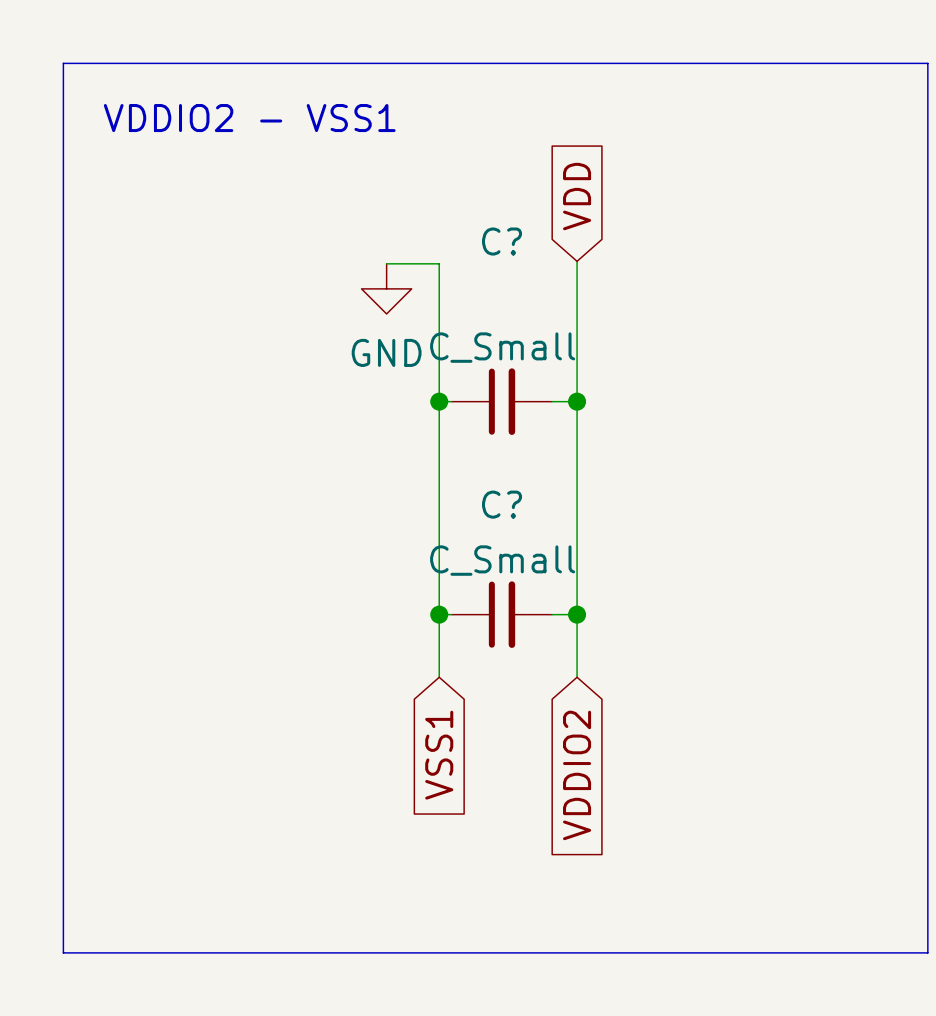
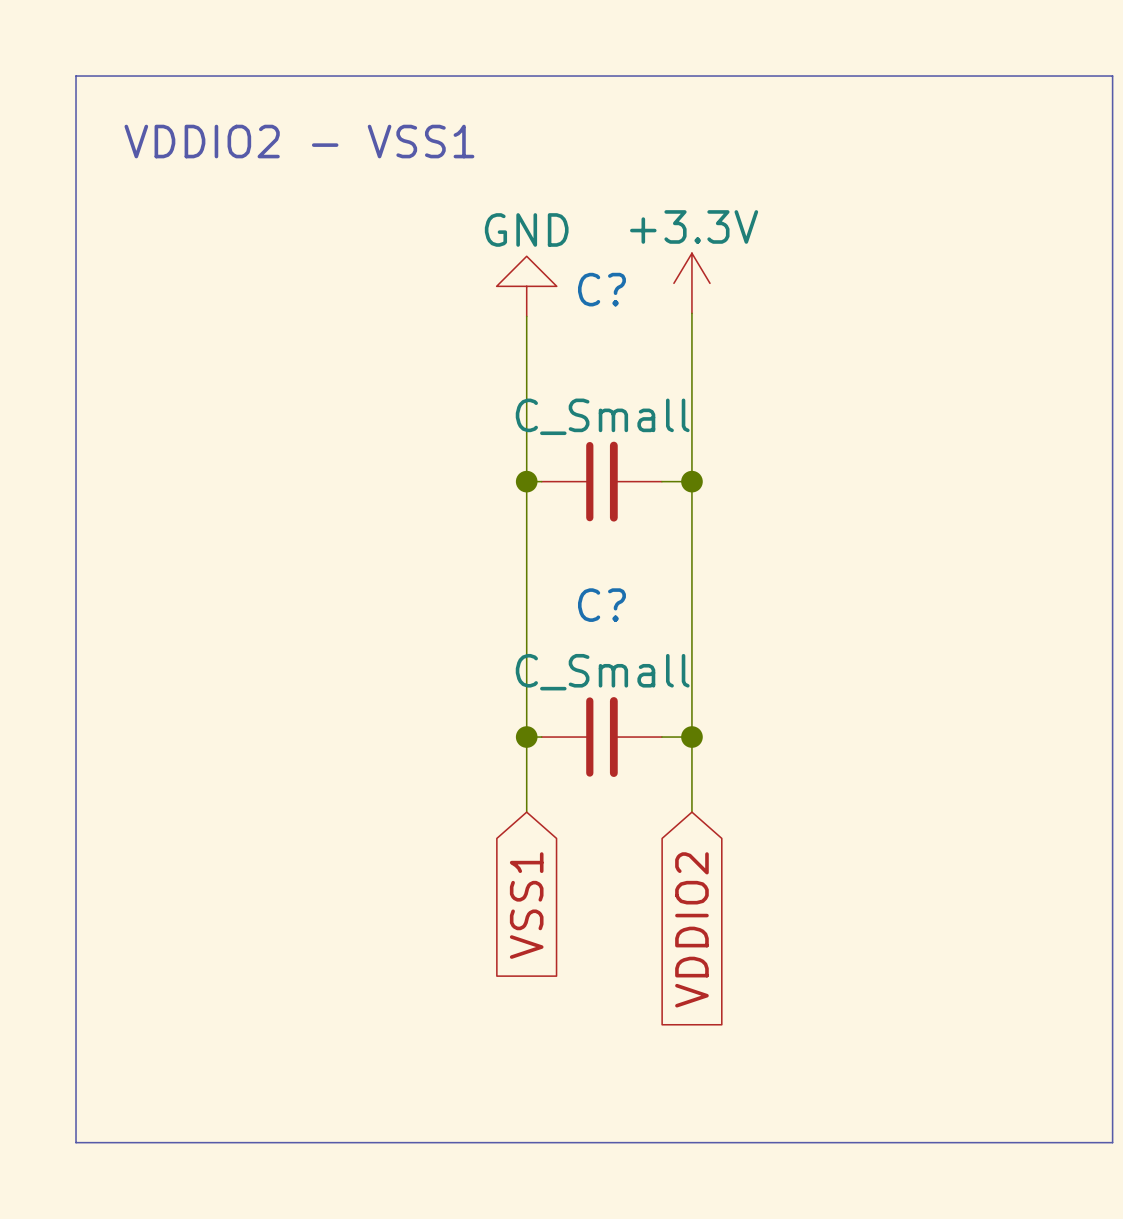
global label: VDD (577, 196) -> none
power symbol: none -> +3.3V (691, 283)
wire: (386, 263) (439, 263) -> none
power symbol rotation: 0° (386, 288) -> 180° (526, 286)
power symbol position: GND (386, 288) -> GND (526, 286)

